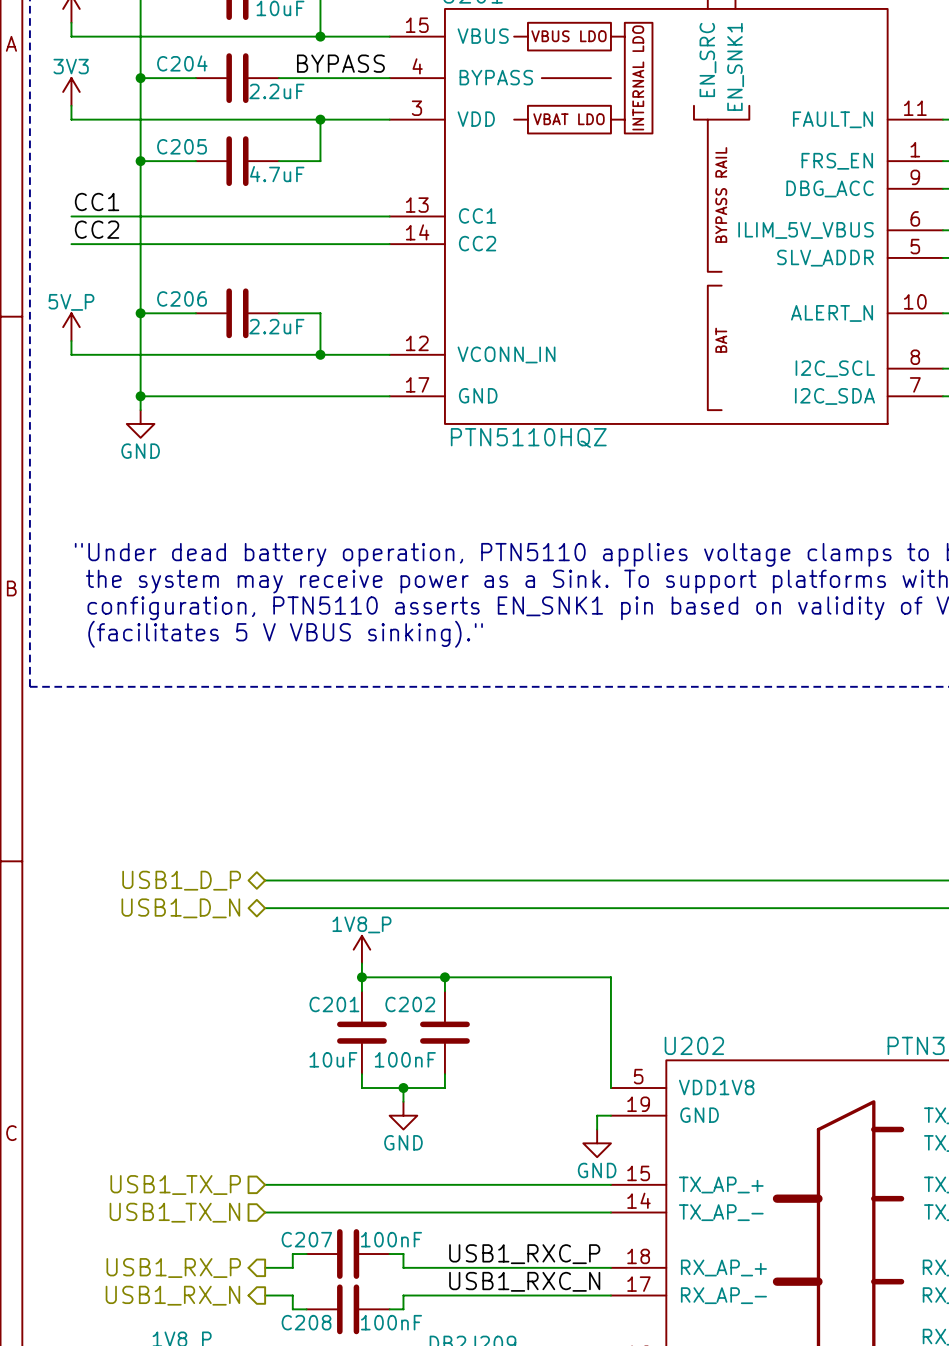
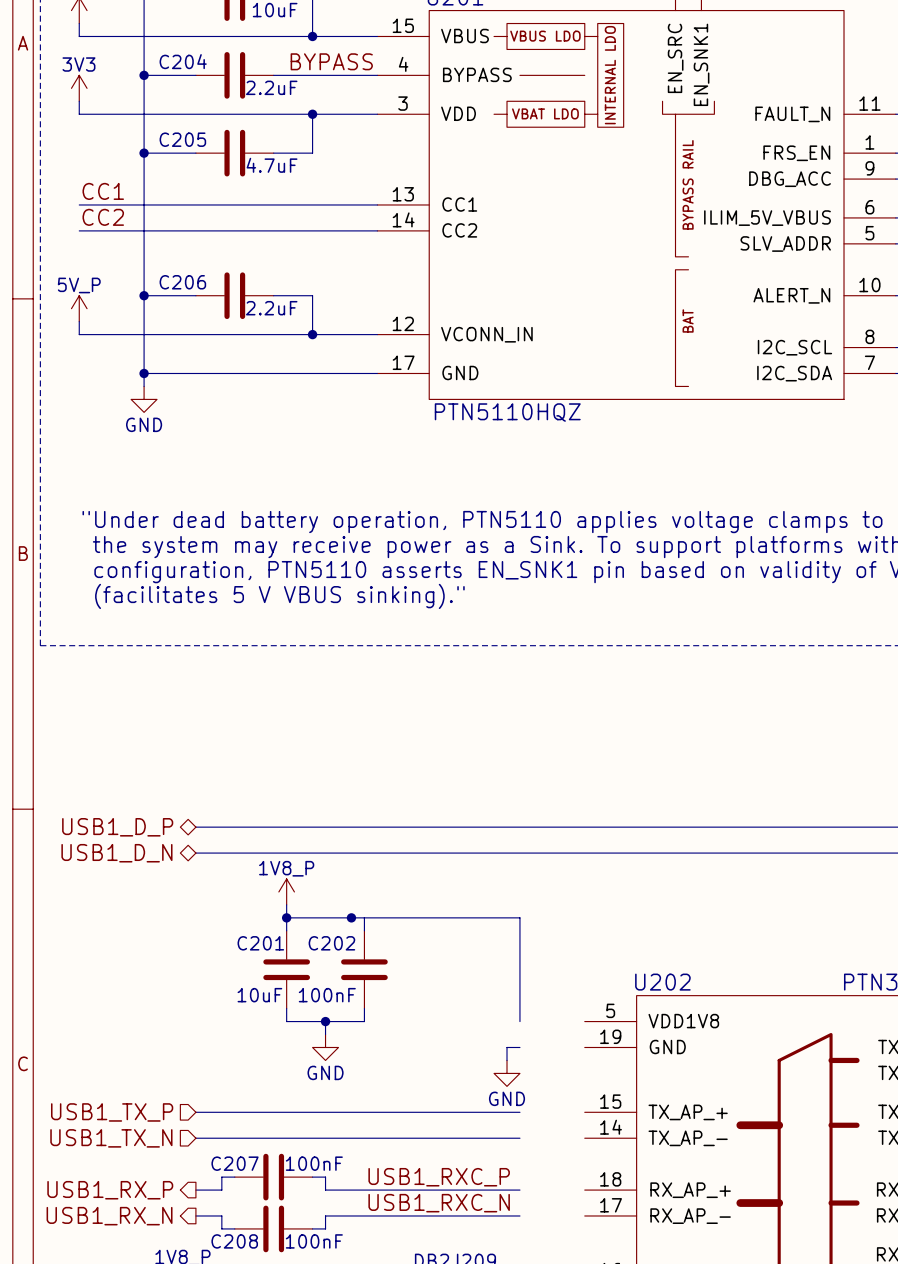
hierarchical label position: USB1_D_P (181, 880) -> USB1_D_P (117, 827)
wire: none -> (195, 827) (260, 827)
hierarchical label position: USB1_D_N (180, 908) -> USB1_D_N (116, 853)
wire: none -> (195, 853) (260, 853)
power symbol position: 1V8_P (361, 949) -> 1V8_P (286, 891)
wire: (361, 963) (361, 991) -> (286, 904) (286, 930)
wire: none -> (286, 917) (351, 917)
junction: none -> (286, 917)
wire: (444, 977) (444, 991) -> (364, 917) (364, 930)
junction: (444, 977) -> none
wire: (541, 977) (610, 977) (610, 1088) -> (519, 917) (519, 1021)
C201 position: (361, 1032) -> (286, 969)
C202 position: (444, 1032) -> (364, 969)
wire: (361, 1074) (361, 1088) -> (286, 1008) (286, 1021) (351, 1021)
wire: (444, 1074) (444, 1088) (375, 1088) -> (364, 1008) (364, 1021)
junction: none -> (325, 1021)
wire: (403, 1088) (403, 1101) -> (325, 1021) (325, 1034)
junction: (403, 1088) -> none
power symbol: none -> GND (325, 1047)
power symbol: GND (403, 1115) -> none
wire: (610, 1115) (597, 1115) (597, 1129) -> (519, 1047) (507, 1047) (507, 1060)
power symbol: none -> GND (507, 1073)
power symbol: GND (597, 1143) -> none
wire: none -> (195, 1112) (260, 1112)
wire: (541, 1184) (610, 1184) -> none
hierarchical label position: USB1_TX_P (175, 1185) -> USB1_TX_P (112, 1112)
hierarchical label position: USB1_TX_N (174, 1212) -> USB1_TX_N (111, 1138)
wire: none -> (195, 1138) (260, 1138)
wire: (541, 1212) (610, 1212) -> none
wire: (306, 1254) (292, 1254) (292, 1267) (265, 1267) -> (234, 1177) (221, 1177) (221, 1190) (195, 1190)
C207 position: (348, 1254) -> (273, 1177)
wire: (389, 1254) (403, 1254) (403, 1267) -> (312, 1177) (325, 1177) (325, 1190) (390, 1190)
label position: USB1_RXC_P (524, 1254) -> USB1_RXC_P (439, 1177)
wire: (541, 1267) (610, 1267) -> none
hierarchical label position: USB1_RX_P (173, 1268) -> USB1_RX_P (110, 1190)
label position: USB1_RXC_N (524, 1281) -> USB1_RXC_N (439, 1203)
hierarchical label position: USB1_RX_N (172, 1295) -> USB1_RX_N (109, 1216)
wire: (265, 1295) (292, 1295) (292, 1309) (306, 1309) -> (195, 1215) (221, 1215) (221, 1228) (234, 1228)
wire: (403, 1295) (403, 1309) (389, 1309) -> (390, 1215) (325, 1215) (325, 1228) (312, 1228)
wire: (541, 1295) (610, 1295) -> none
C208 position: (348, 1309) -> (273, 1228)

